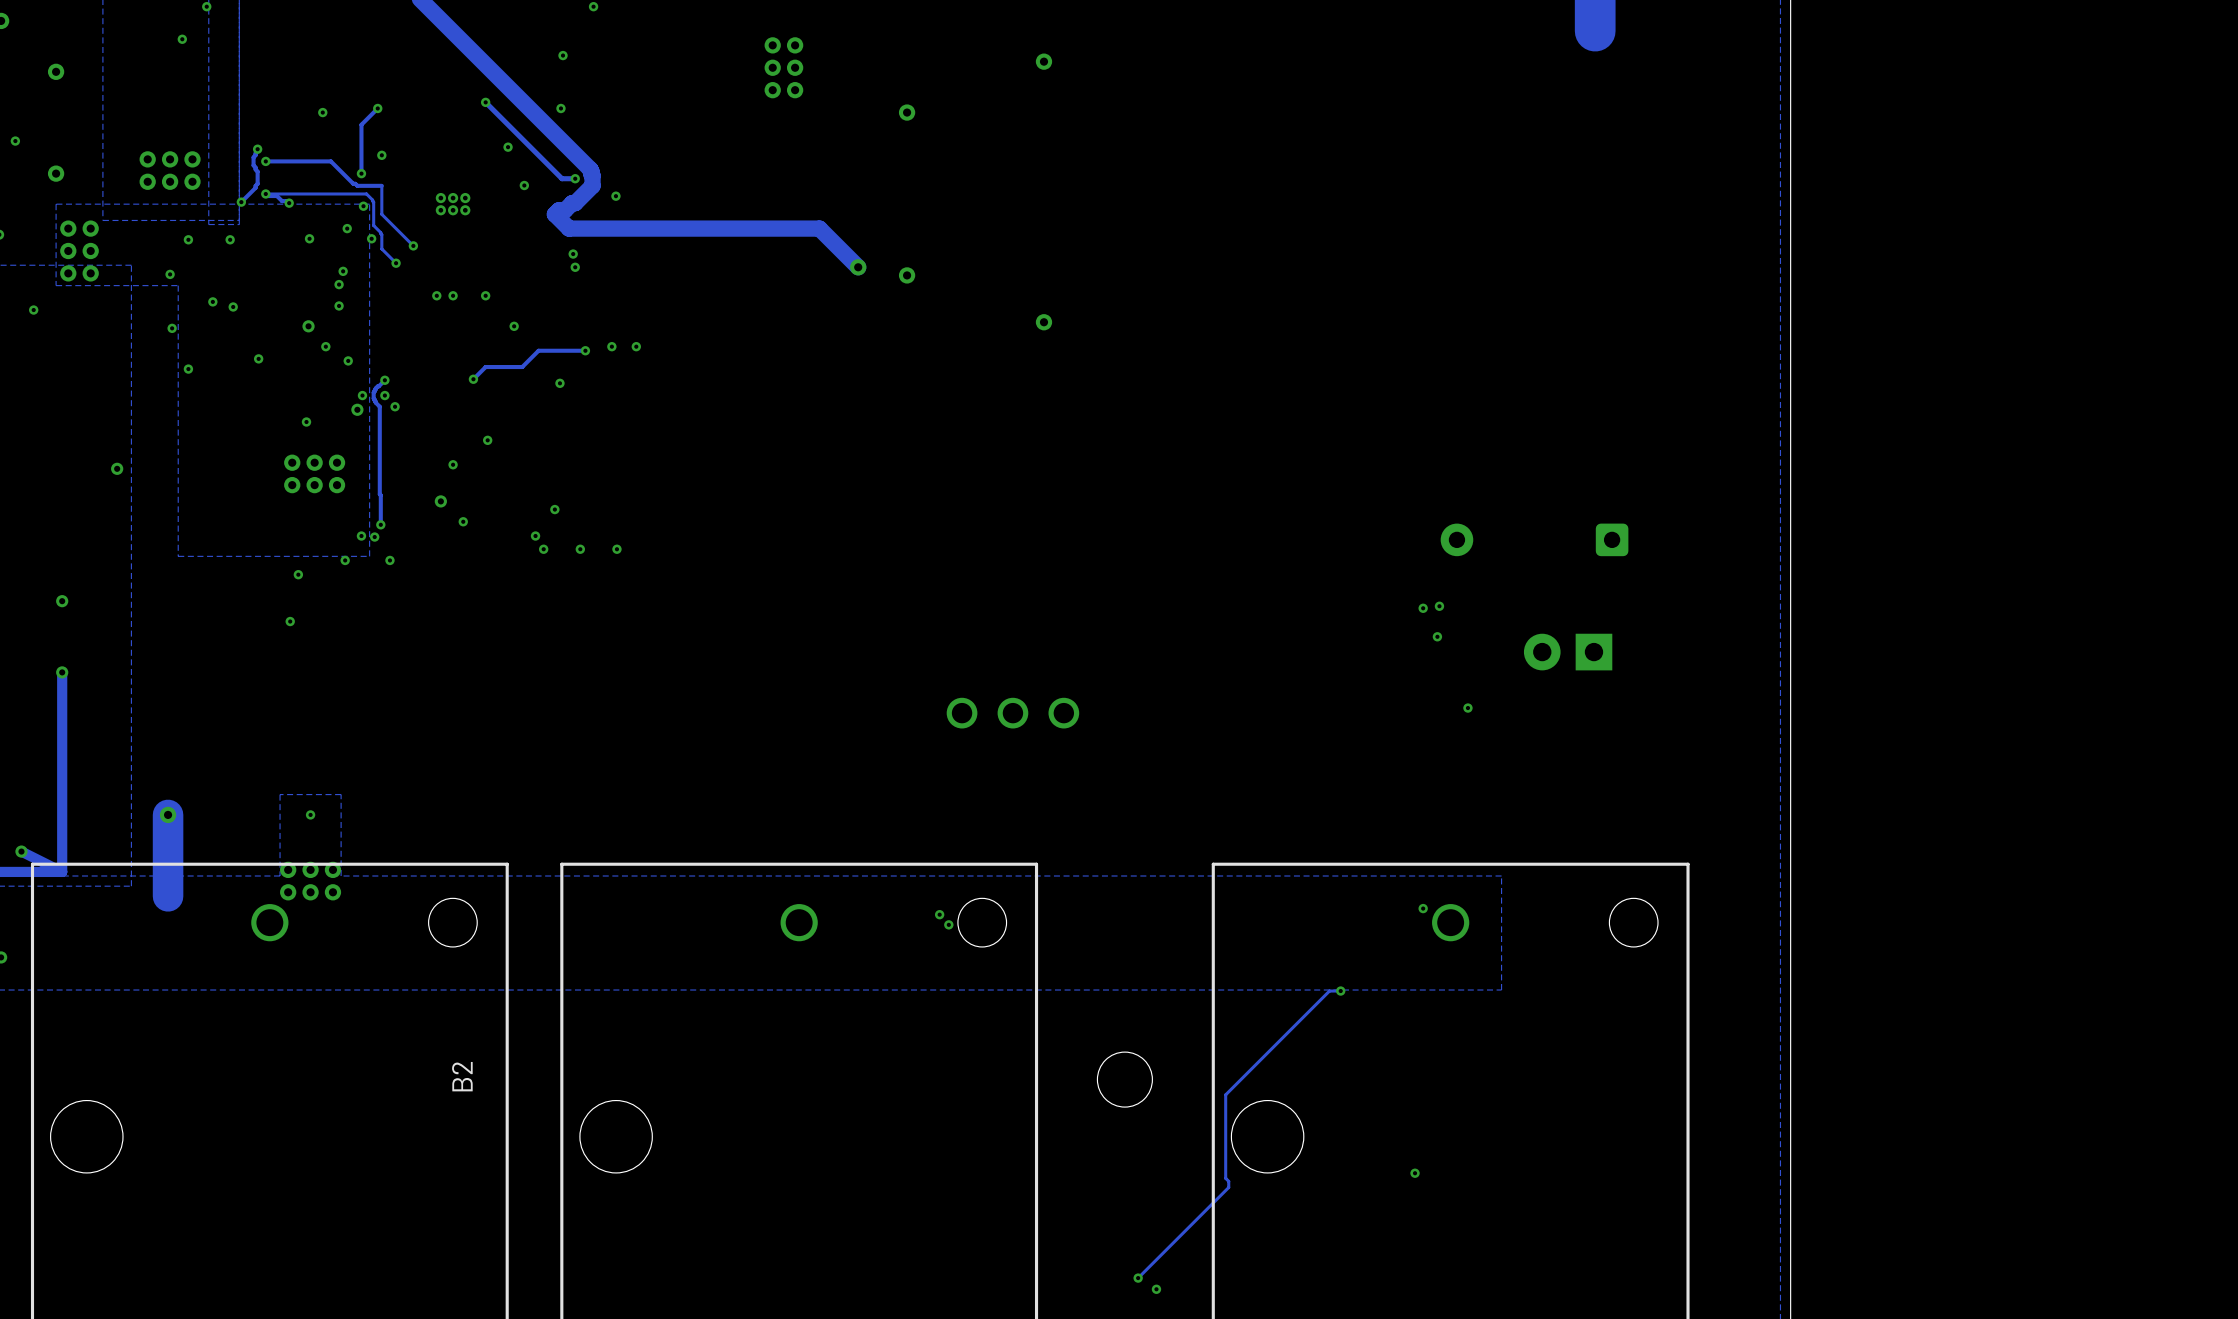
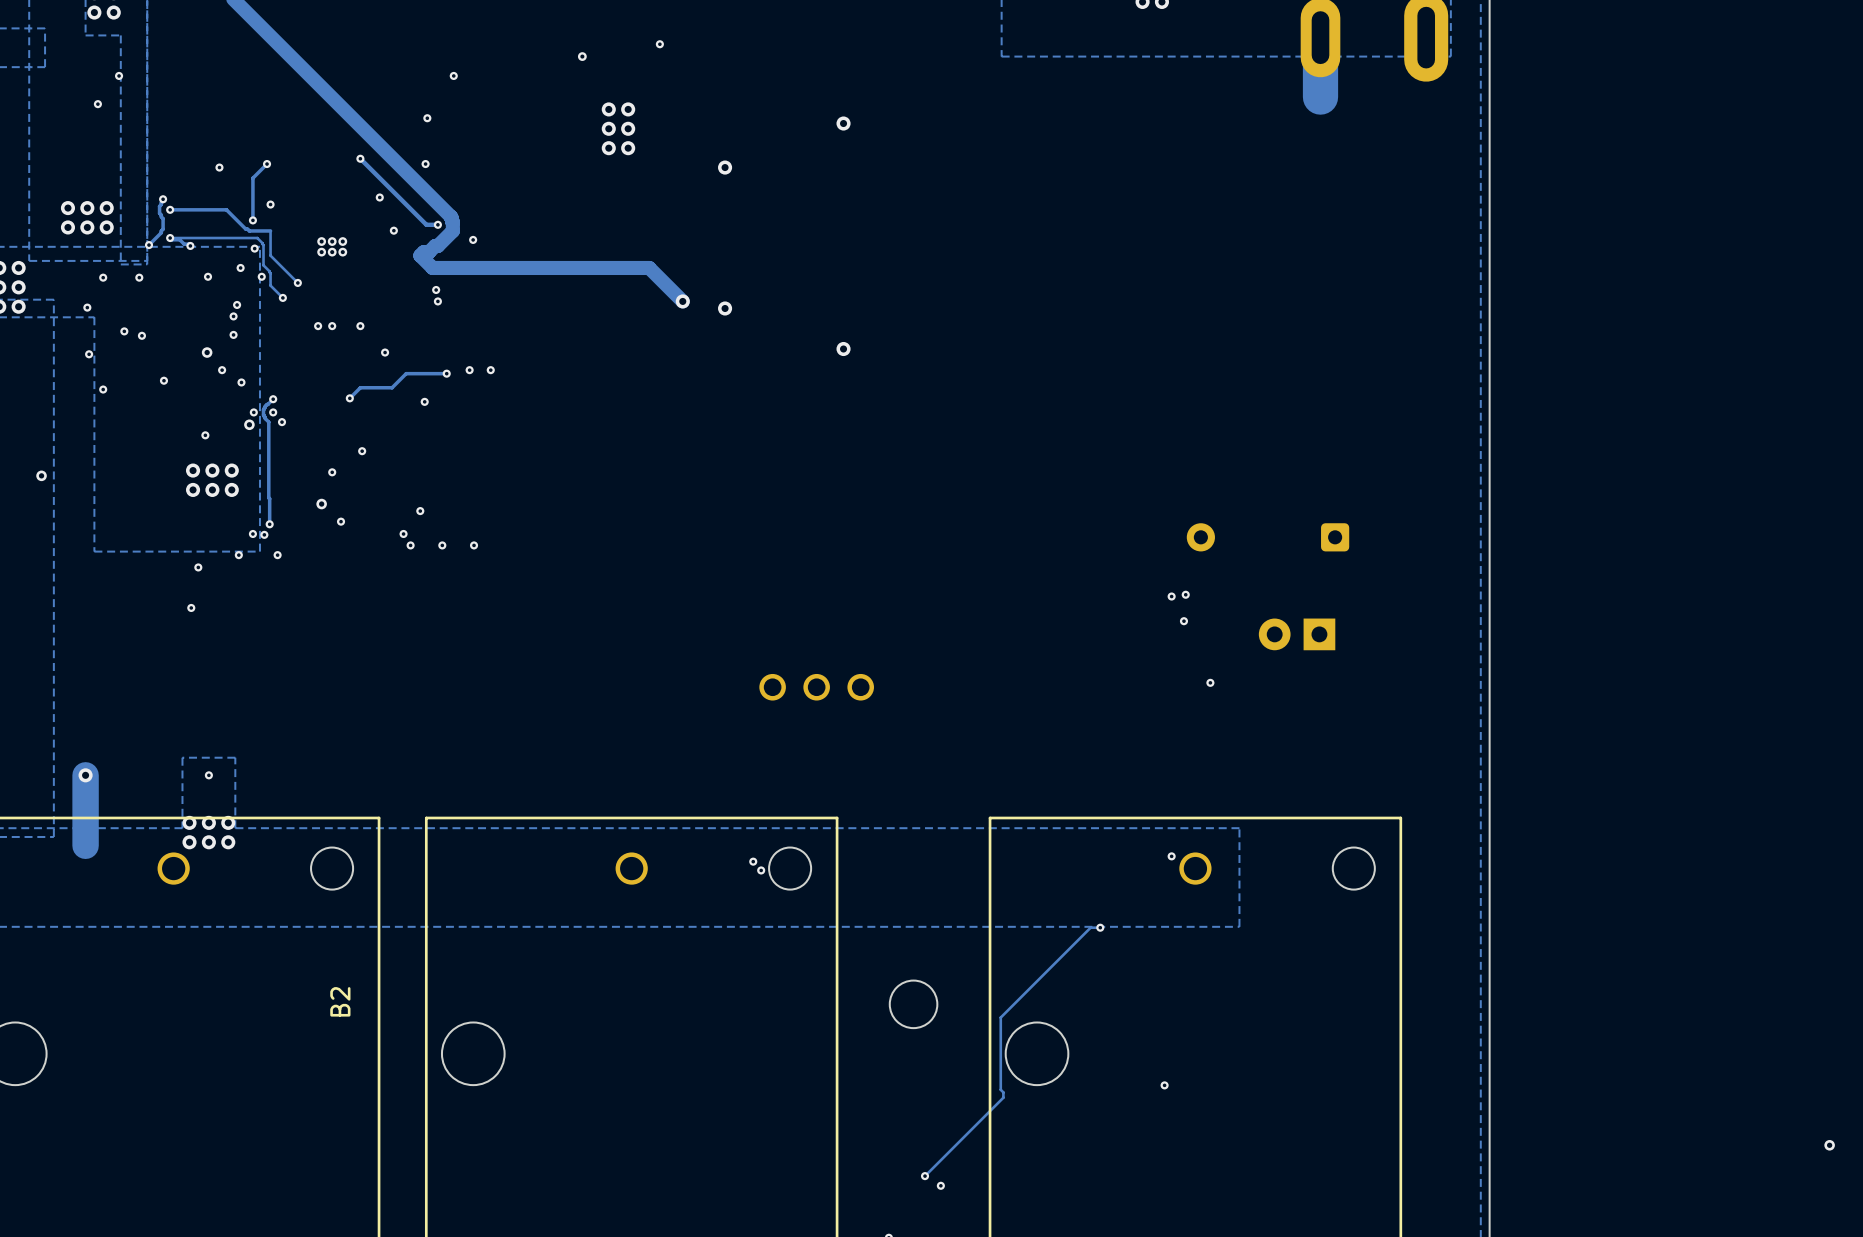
via: none -> (1829, 1145)

